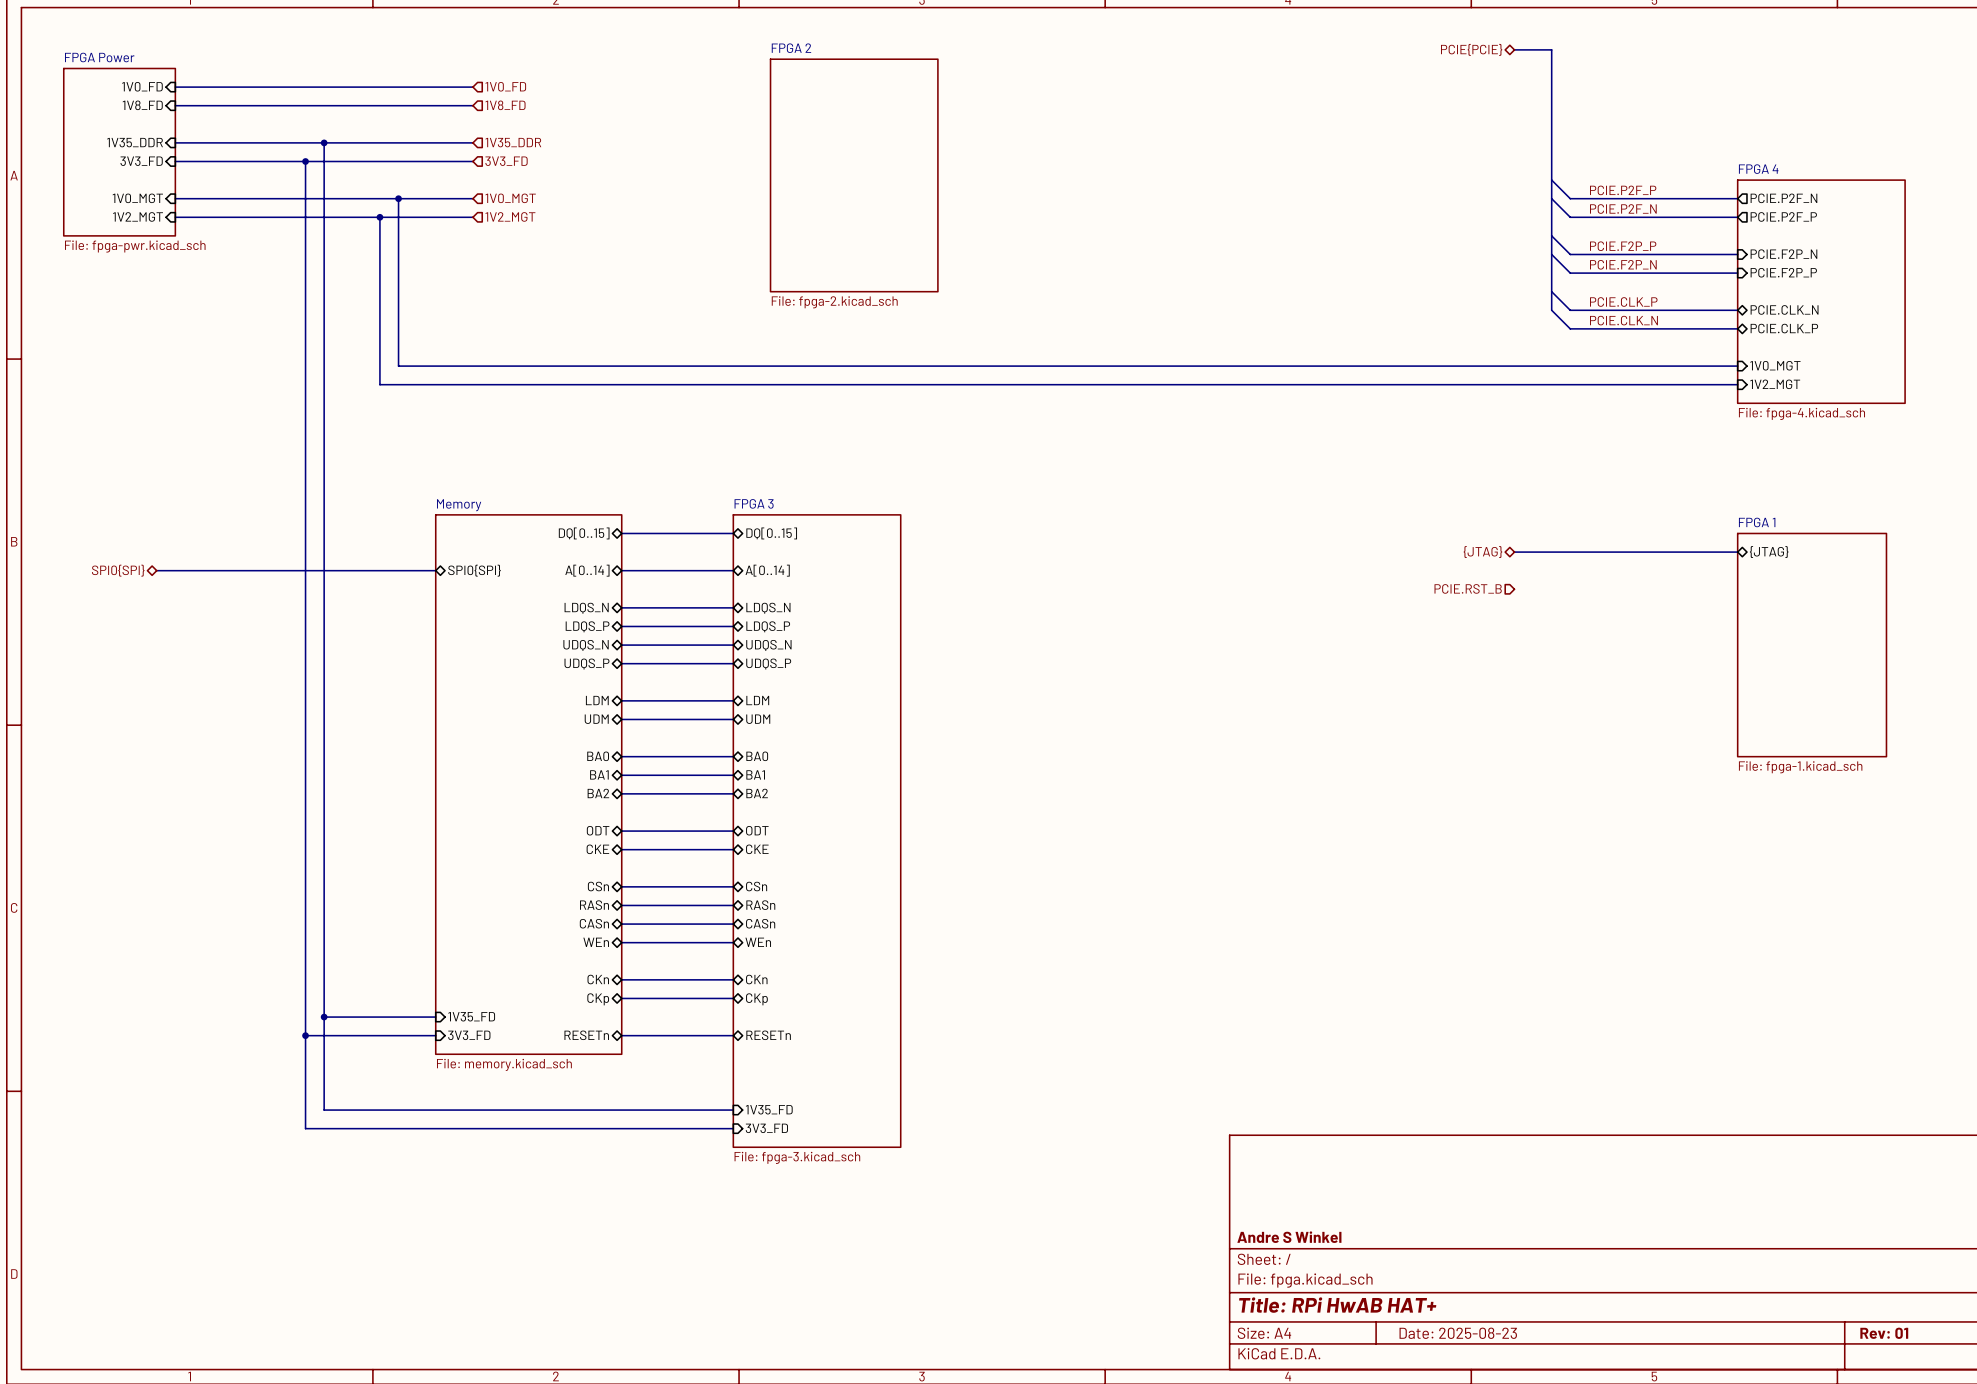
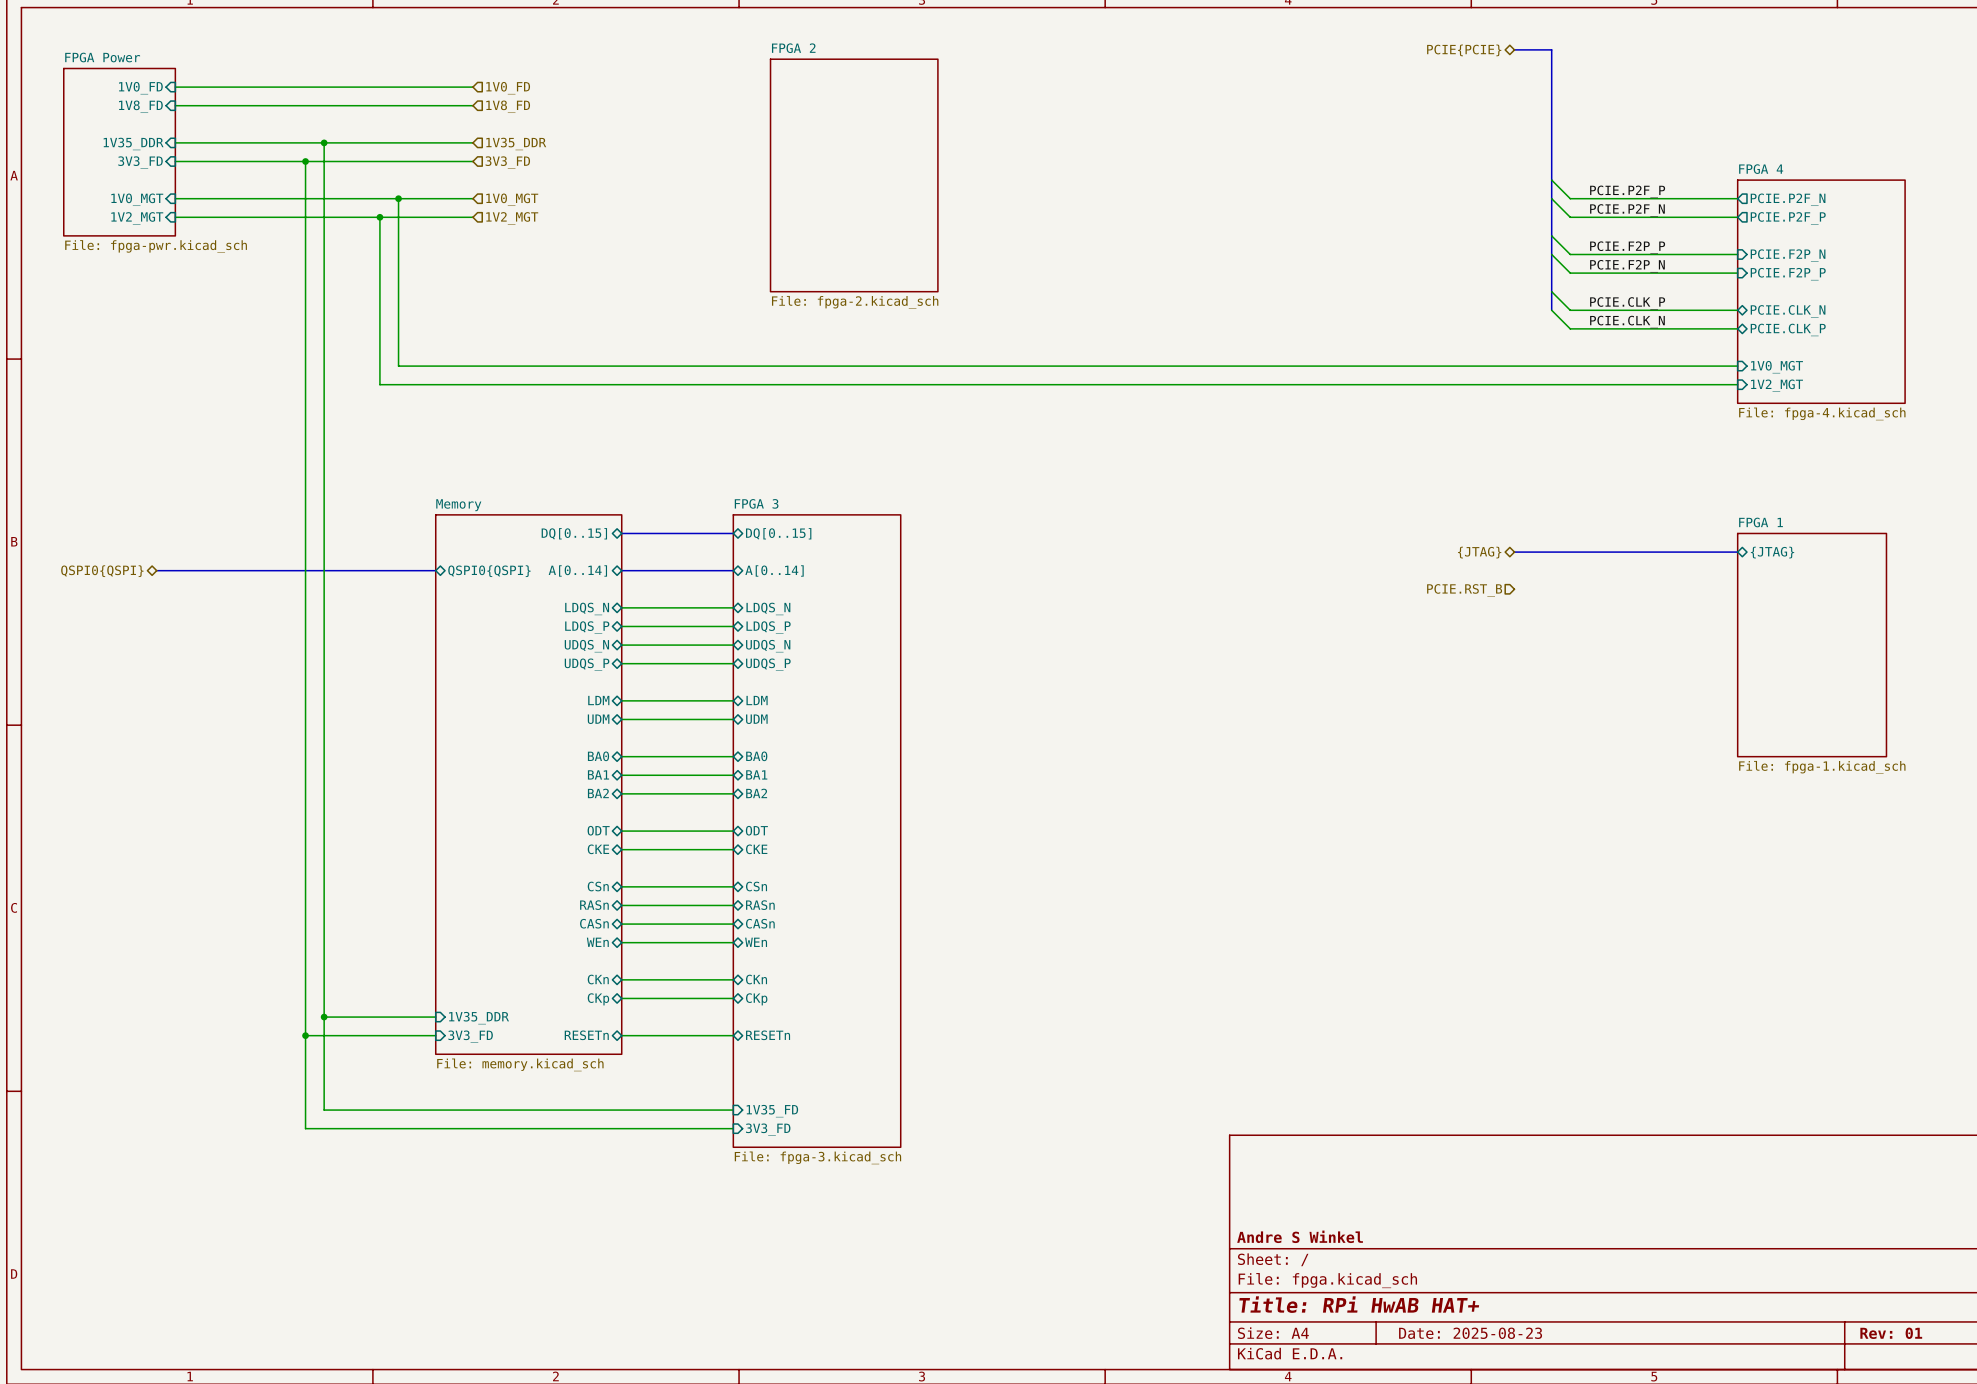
hierarchical label: SPI0{SPI} (118, 570) -> QSPI0{QSPI} (102, 571)
sheet pin: SPI0{SPI} (474, 570) -> QSPI0{QSPI} (489, 571)
sheet pin: 1V35_FD (471, 1016) -> 1V35_DDR (479, 1018)

